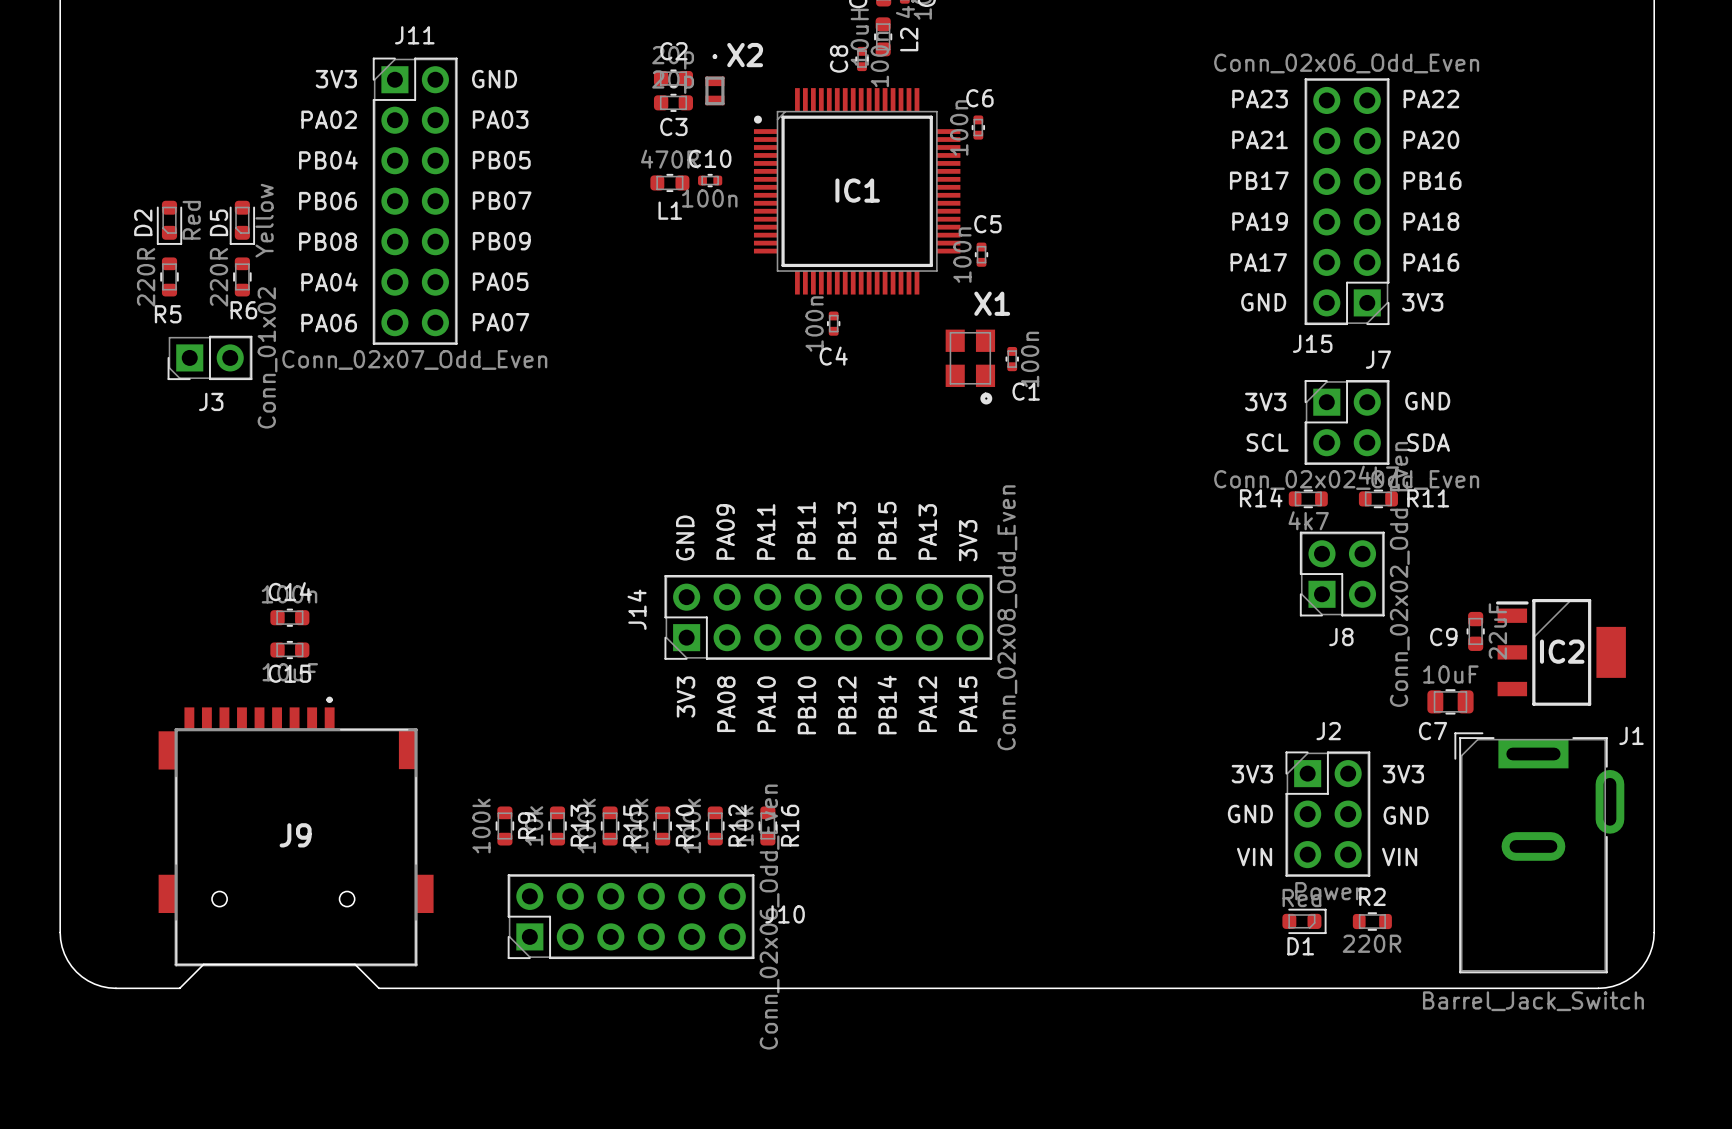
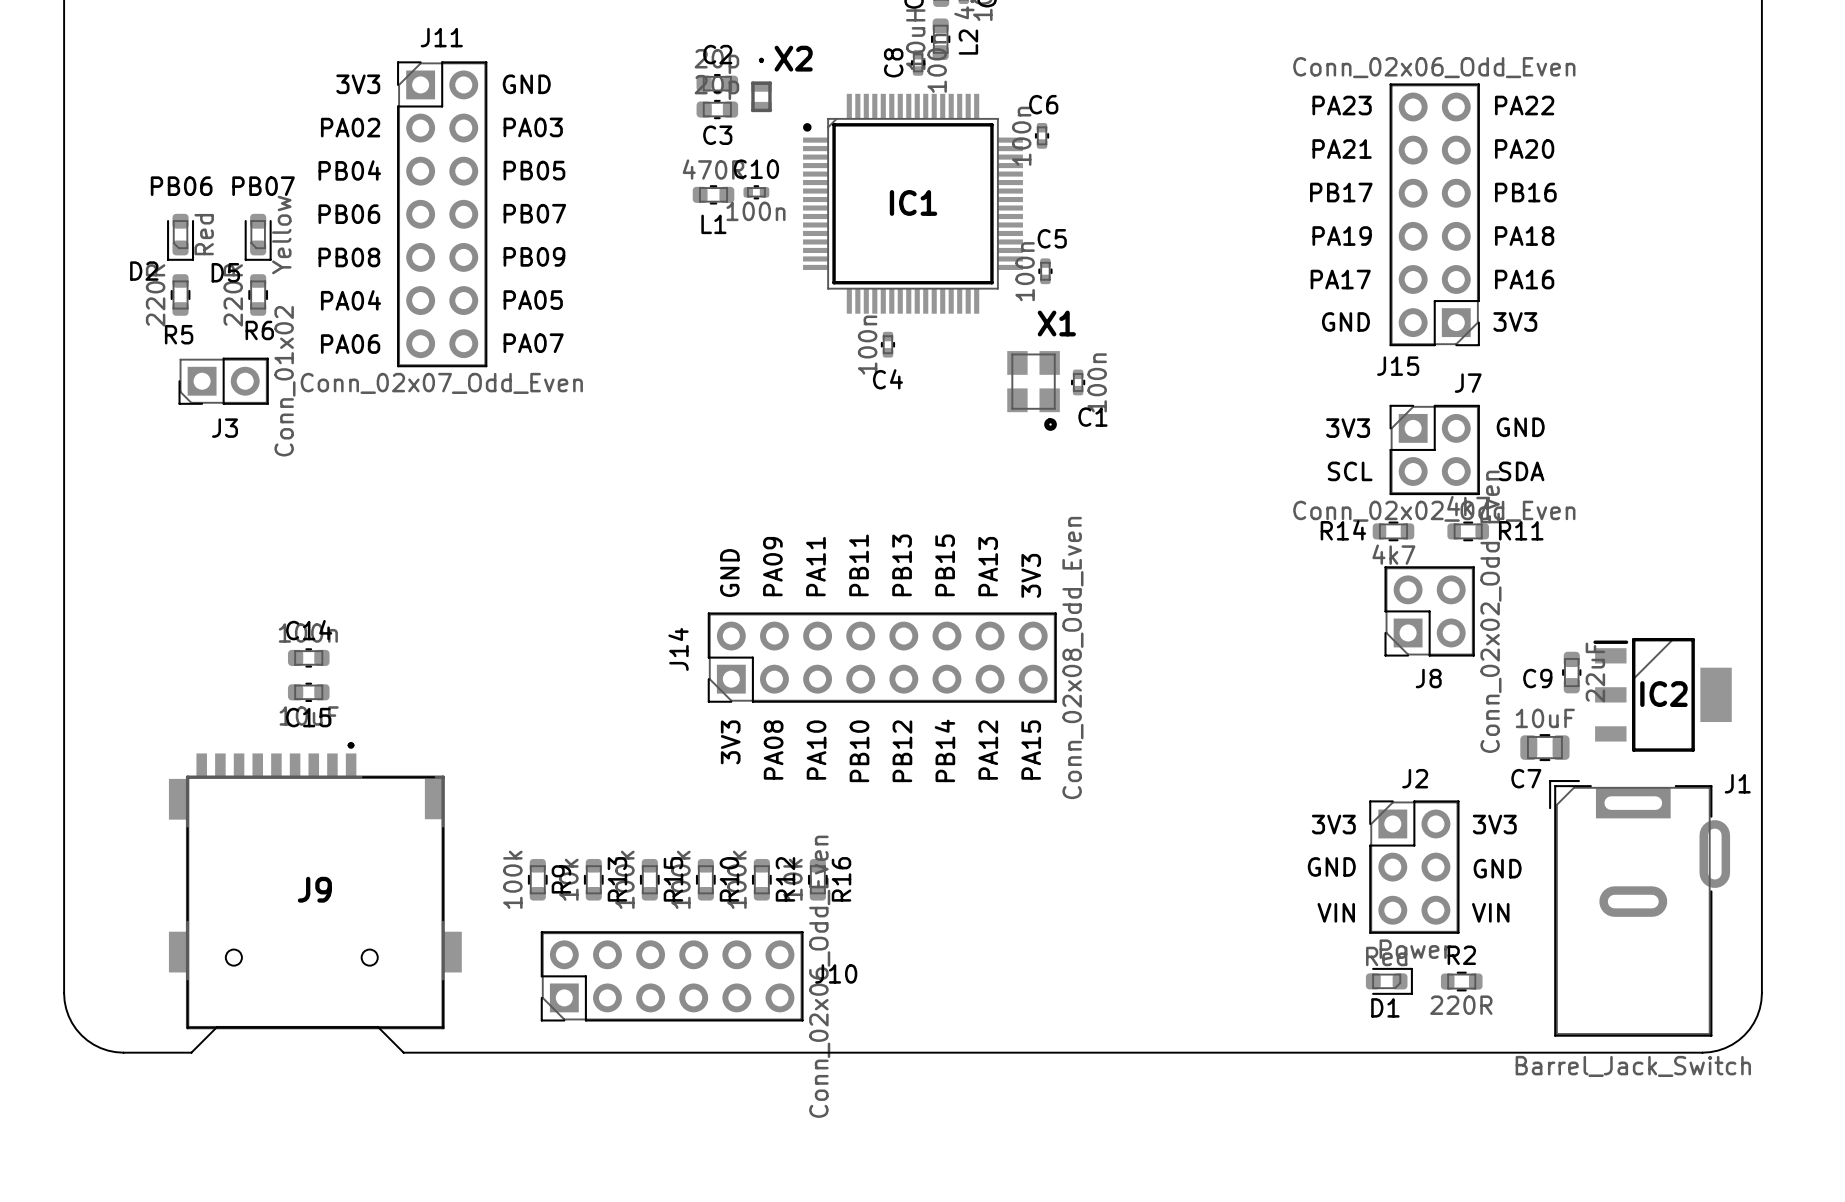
text: none -> PB06 (181, 186)
text: none -> PB07 (263, 186)
D2 name rotation: 0° (143, 222) -> 90° clockwise (144, 271)
D5 name rotation: 0° (218, 222) -> 90° clockwise (225, 272)

